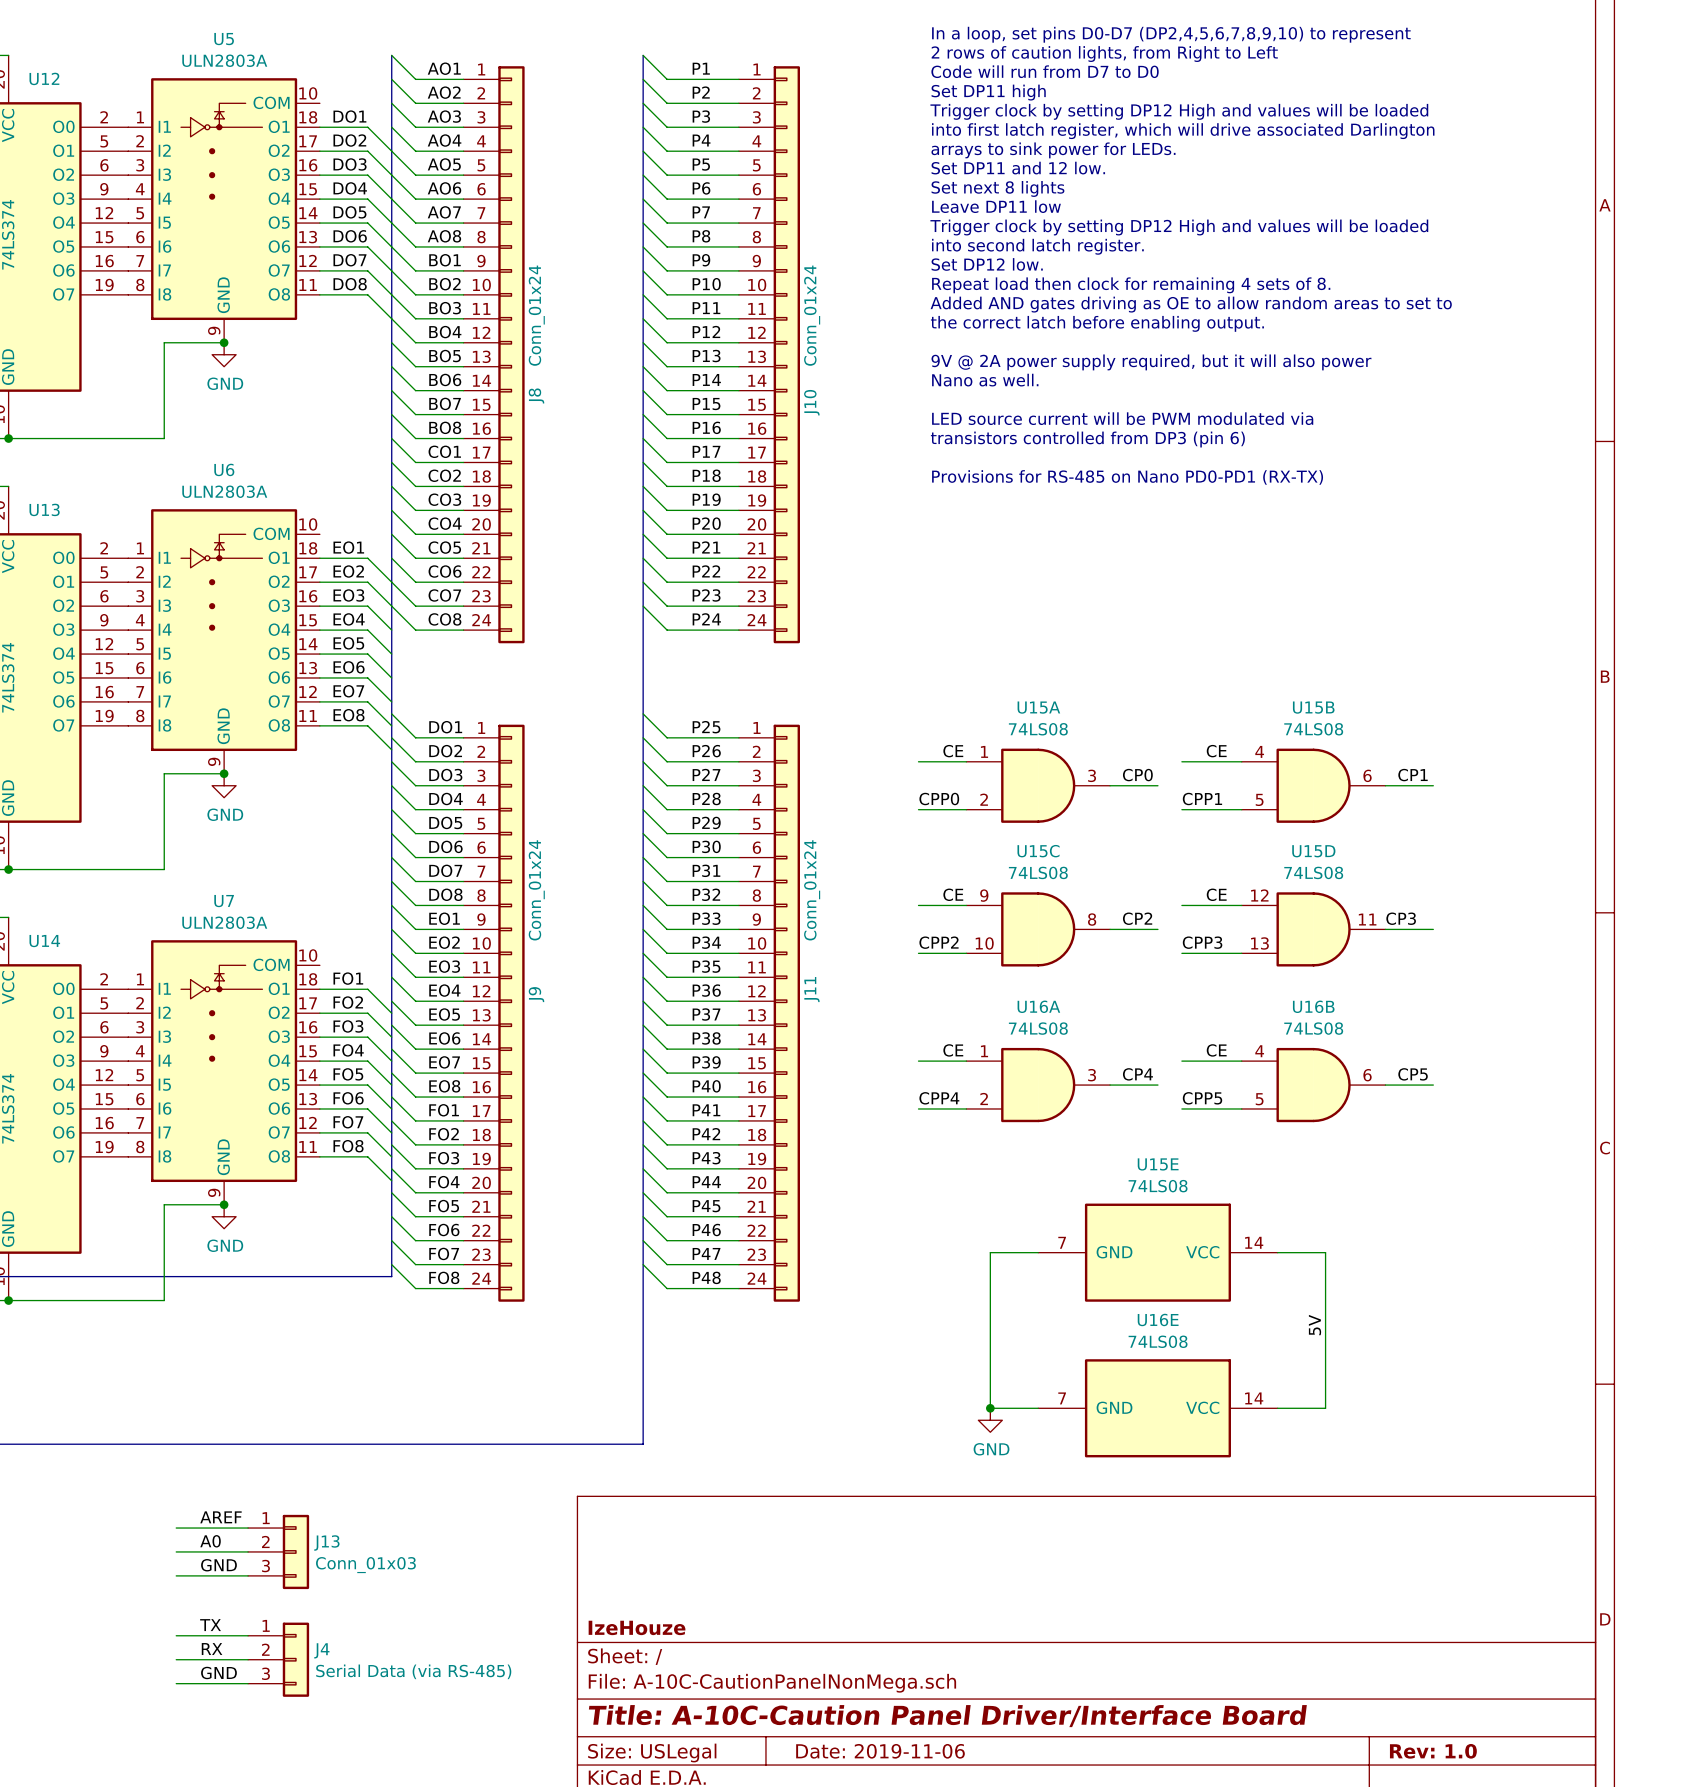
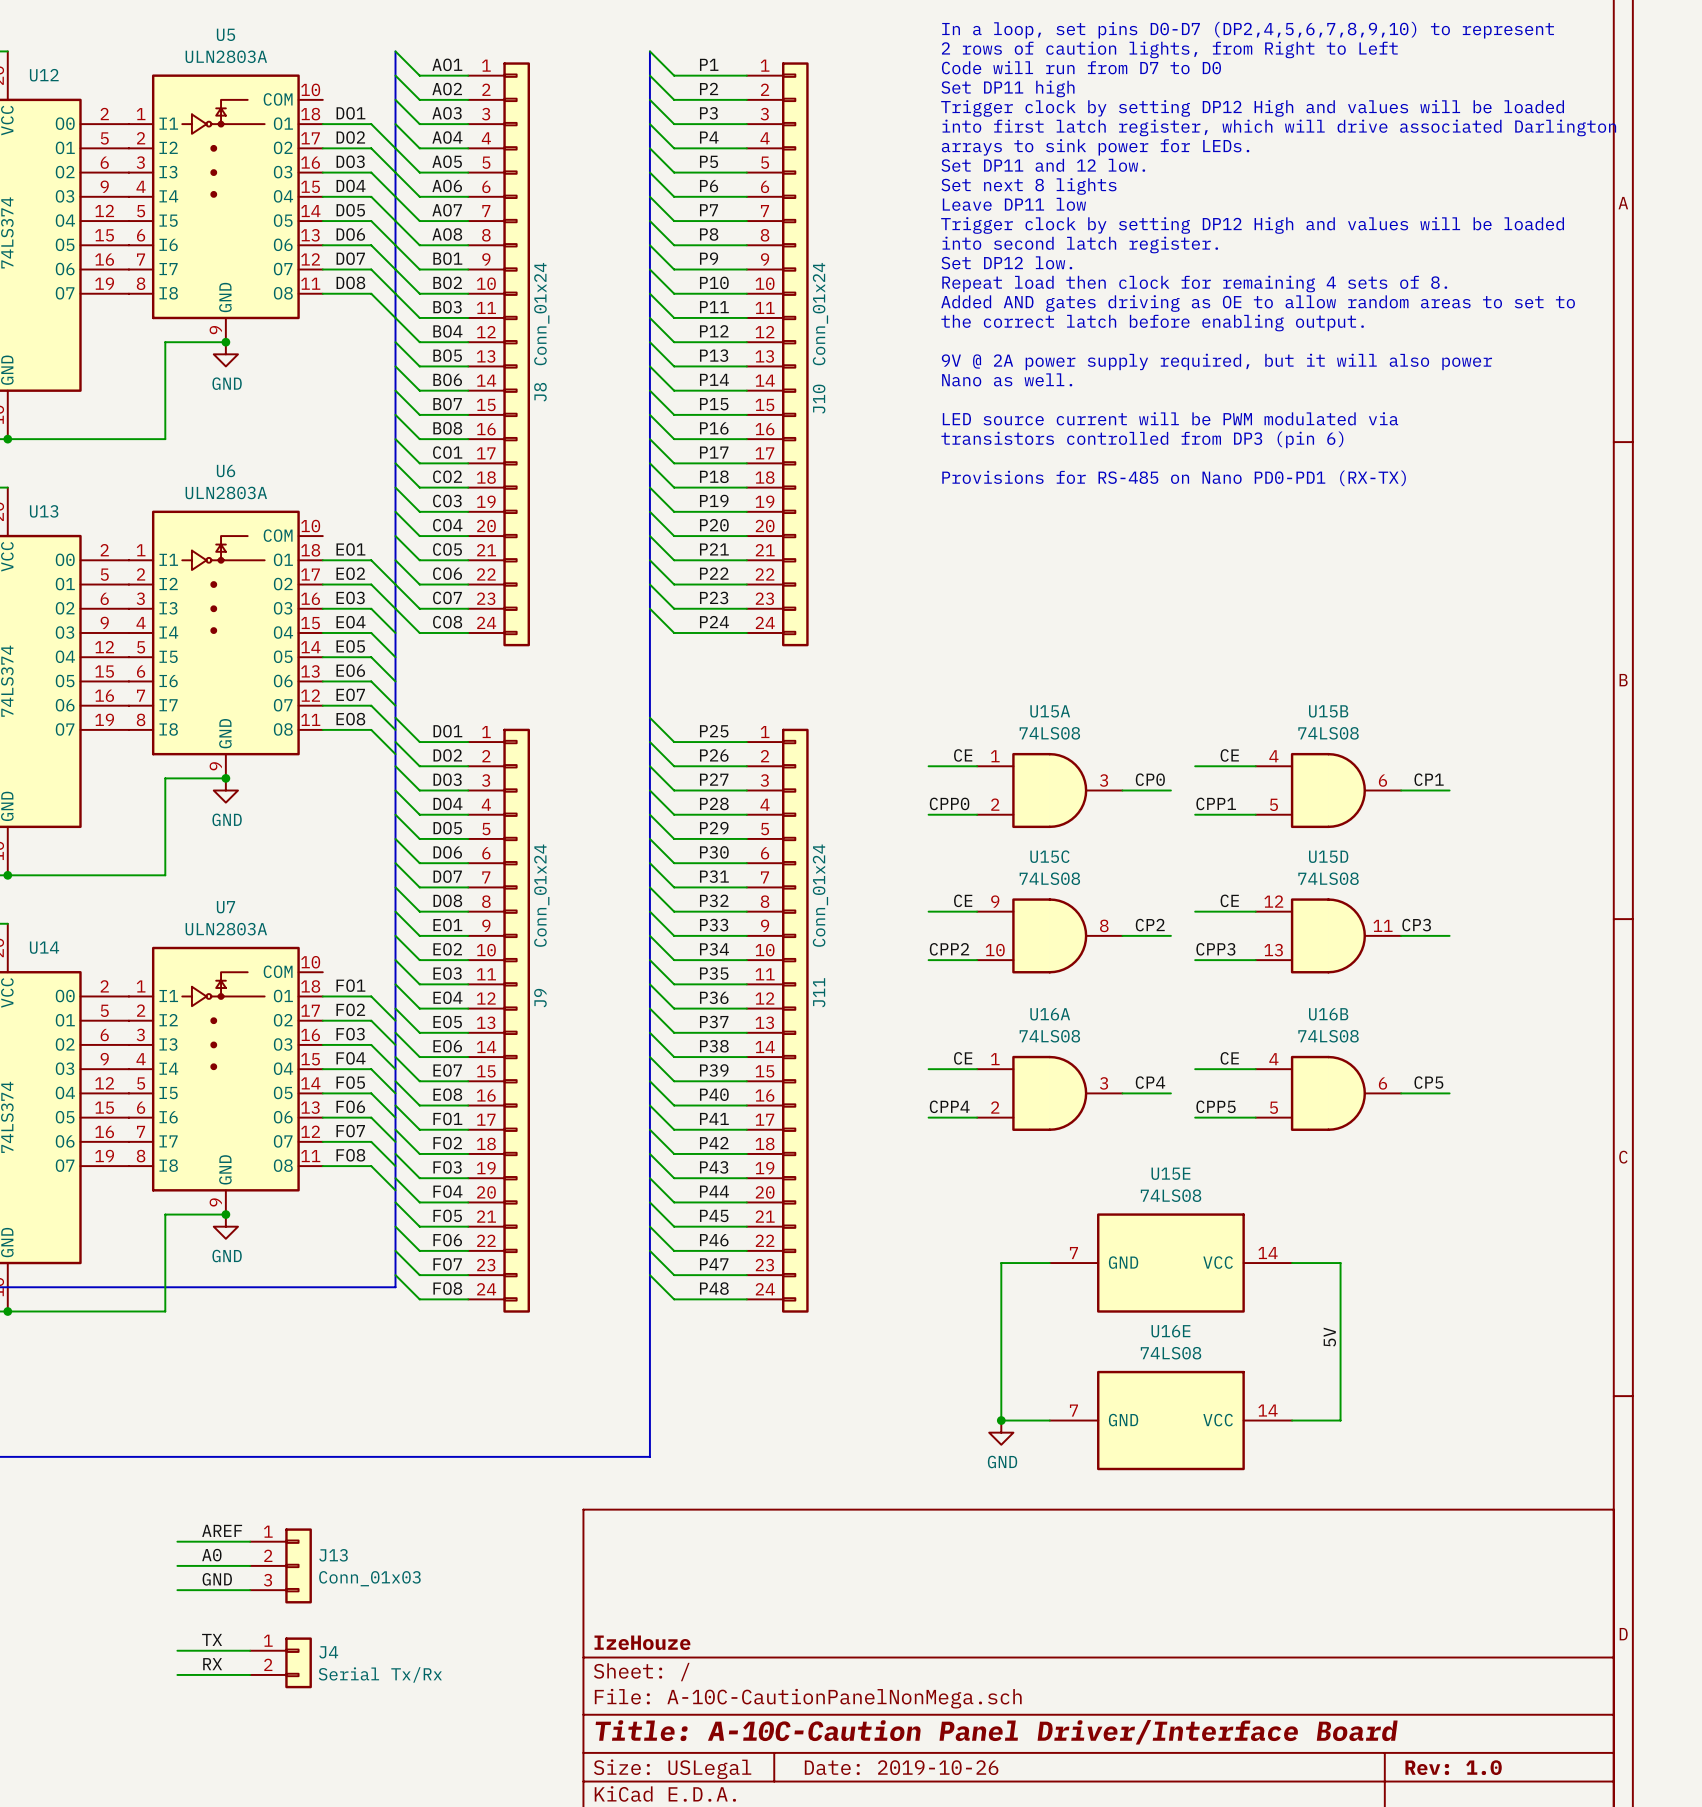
J4 symbol: [248, 1622, 310, 1697] -> [250, 1637, 312, 1689]
J4 value: Serial Data (via RS-485) (413, 1671) -> Serial Tx/Rx (380, 1674)
label: GND (218, 1672) -> none
wire: (176, 1683) (248, 1683) -> none
title block: Date: 2019-11-06 (880, 1751) -> Date: 2019-10-26 (901, 1767)

